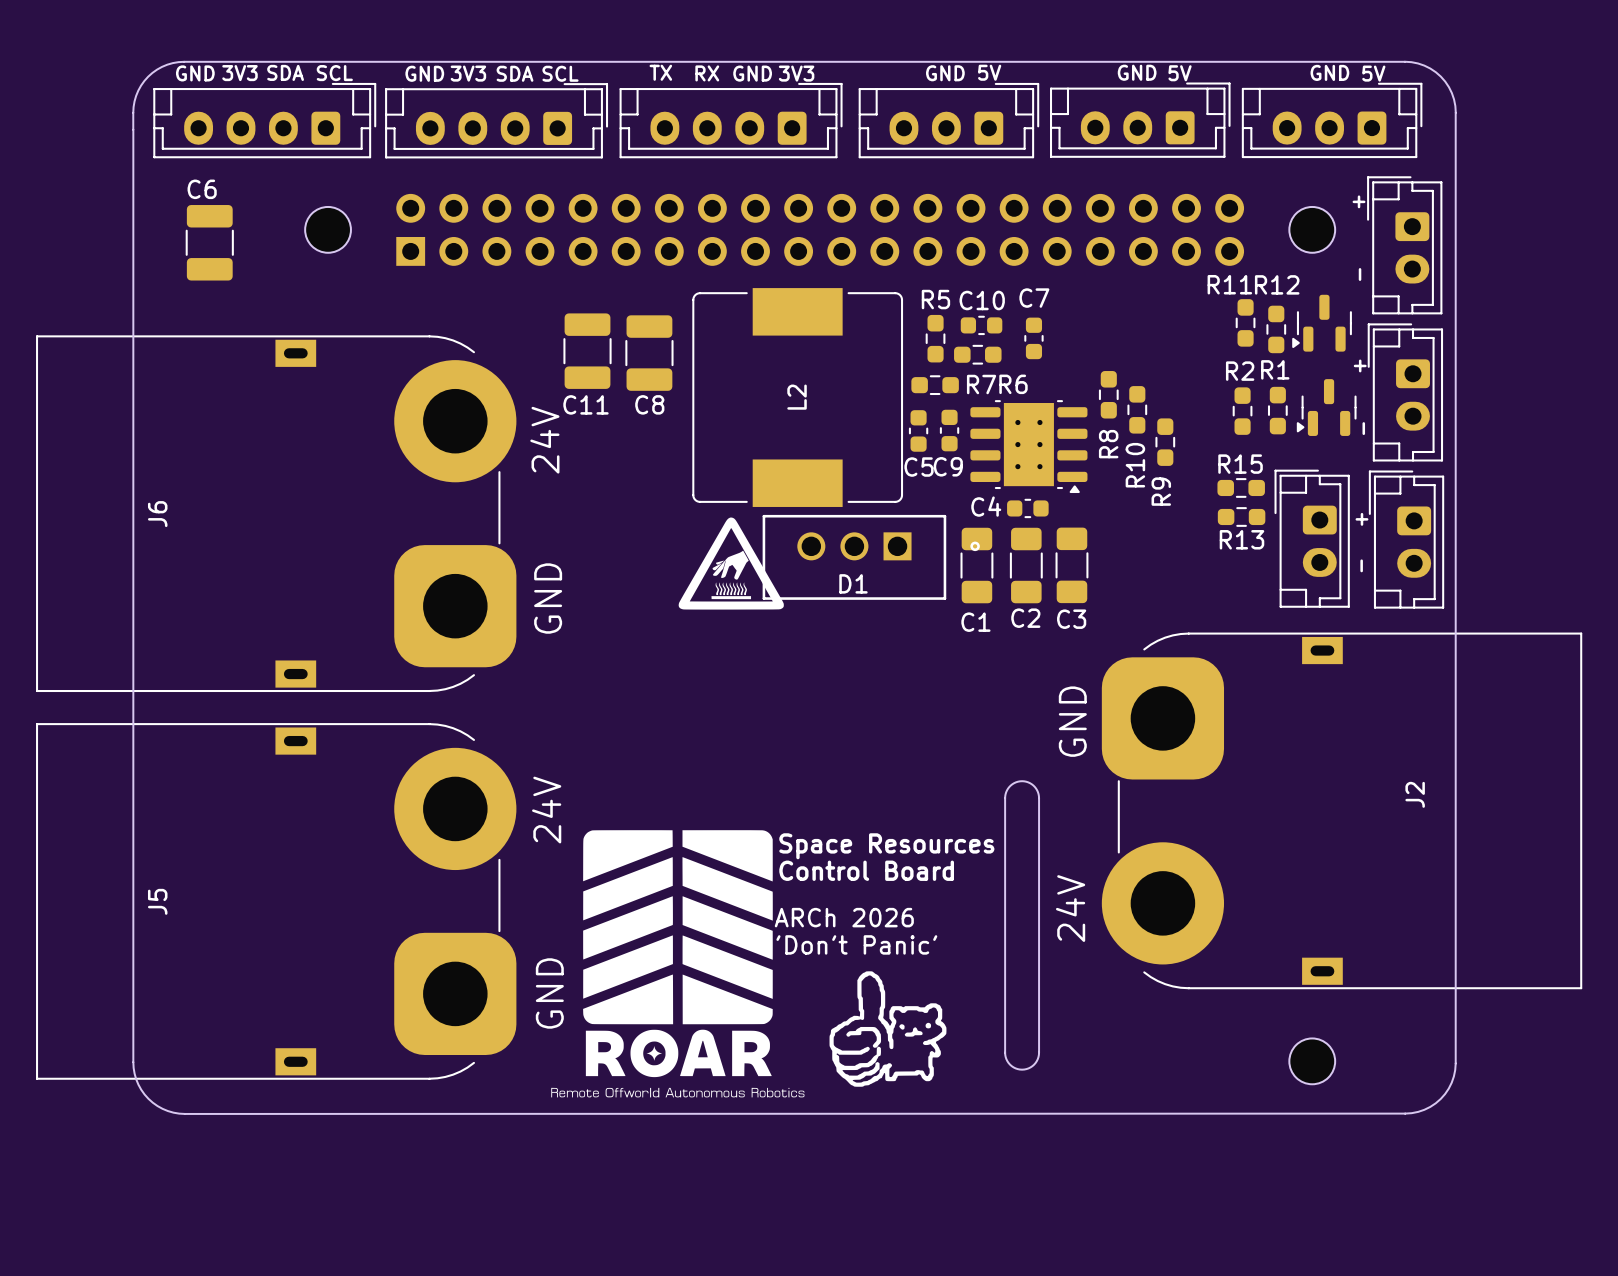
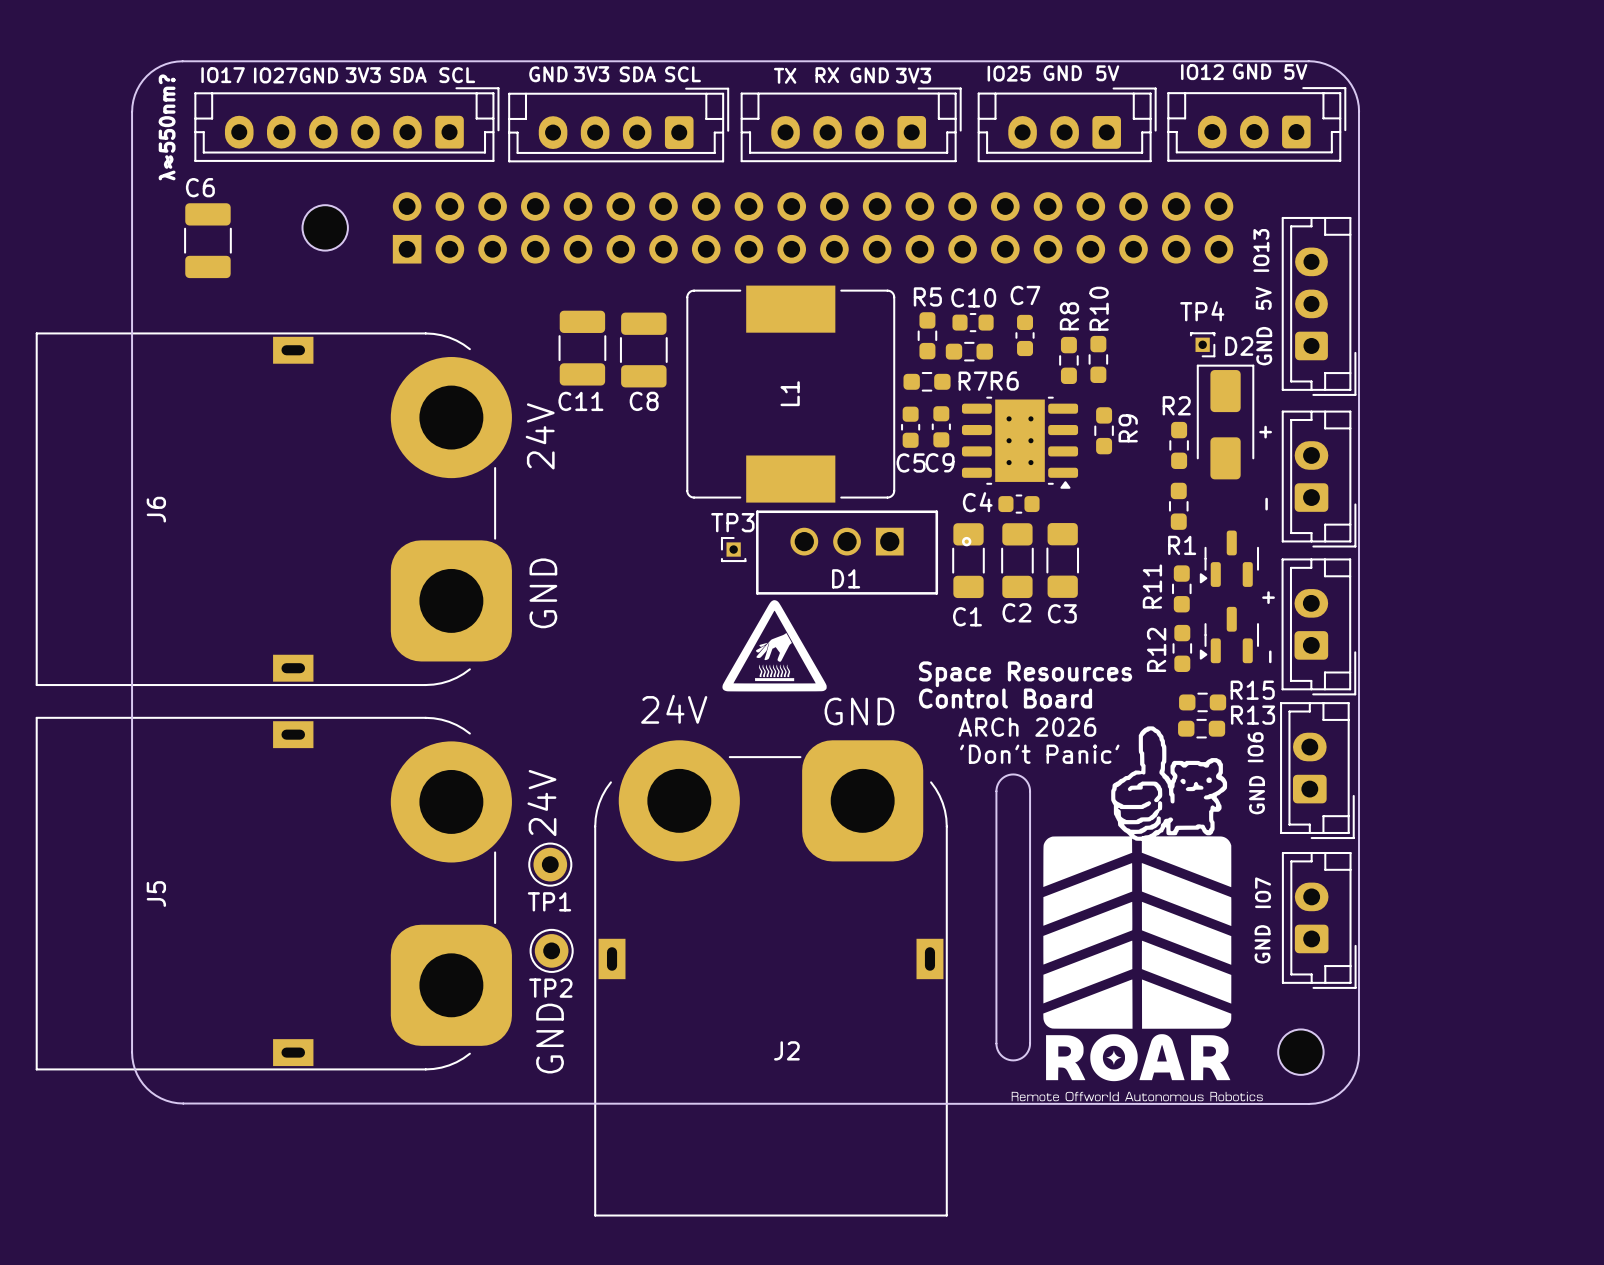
board edge: (1320, 61) (1404, 61) -> (1308, 61) (1325, 64) (1344, 75) (1356, 95) (1359, 111)
board edge: (1404, 61) (1424, 65) (1440, 76) (1451, 93) (1455, 112) -> none
text: SDA (285, 72) -> IO27 (275, 75)
text position: TX (660, 72) -> TX (785, 75)
text: 5V (989, 72) -> none
text: GND (1137, 72) -> none
text: none -> IO12 (1202, 72)
text: none -> GND (1252, 71)
text: none -> 5V (1295, 71)
text: GND (1329, 72) -> none
text: GND (195, 73) -> none
text: 3V3 (240, 73) -> none
text: SCL (334, 73) -> GND (318, 75)
text: GND (424, 73) -> SDA (408, 74)
text: 3V3 (468, 73) -> SCL (457, 75)
text: SDA (515, 73) -> none
text: SCL (560, 73) -> GND (548, 74)
text position: RX (707, 73) -> RX (827, 75)
text: GND (752, 73) -> none
text: 3V3 (796, 73) -> none
text: GND (945, 73) -> none
text: none -> GND (1062, 73)
text position: 5V (1180, 73) -> 5V (1107, 73)
text: 5V (1373, 73) -> none
text: none -> 3V3 (591, 74)
text: none -> SDA (637, 74)
text: none -> SCL (682, 74)
text: none -> IO25 (1009, 73)
text: none -> IO17 (223, 75)
text: none -> 3V3 (363, 75)
text: none -> GND (869, 75)
text: none -> 3V3 (913, 75)
board edge: (1455, 112) (1455, 1063) (1451, 1082) (1440, 1098) (1424, 1109) (1405, 1113) (185, 1113) (167, 1111) (152, 1102) (138, 1084) (133, 1062) (133, 129) -> (1359, 111) (1359, 1054) (1355, 1073) (1344, 1089) (1327, 1100) (1308, 1103) (183, 1103) (166, 1100) (151, 1092) (137, 1074) (132, 1052) (132, 128)
part: (264, 120) -> none
part: (496, 120) -> none
part: (731, 120) -> none
part: (948, 120) -> none
part: (1140, 120) -> none
part: (1332, 120) -> none
part: none -> (346, 124)
part: none -> (851, 124)
part: none -> (1067, 124)
part: none -> (1256, 124)
part: none -> (618, 125)
text: none -> λ≈550nm? (167, 127)
text: + (1359, 201) -> none
part: (1312, 229) -> none
part: (1404, 245) -> none
text: none -> IO13 (1261, 250)
text: - (1360, 274) -> none
R11 name rotation: 0° (1229, 284) -> 90° counterclockwise (1152, 586)
R12 name rotation: 0° (1277, 284) -> 90° counterclockwise (1156, 649)
part footprint: [1292, 294, 1352, 352] -> [1281, 216, 1357, 396]
text: none -> 5V (1263, 298)
R11 position: (1245, 322) -> (1181, 588)
R12 position: (1276, 329) -> (1182, 648)
TP4: none -> (1202, 344)
text: none -> GND (1264, 346)
text: + (1360, 365) -> none
R1 name position: R1 (1275, 369) -> R1 (1182, 545)
part: (1405, 392) -> none
R8 position: (1108, 394) -> (1068, 360)
L2 name: L2 (797, 397) -> L1 (790, 393)
part: (1326, 407) -> none
R10 position: (1137, 409) -> (1098, 359)
R1 position: (1277, 410) -> (1178, 506)
R2 position: (1242, 411) -> (1179, 445)
D2: none -> (1225, 422)
text: - (1363, 428) -> none
text: none -> + (1265, 432)
R9 position: (1165, 442) -> (1104, 430)
R8 name position: R8 (1108, 444) -> R8 (1069, 316)
R15 name position: R15 (1240, 464) -> R15 (1252, 690)
R10 name position: R10 (1135, 465) -> R10 (1099, 308)
part: none -> (1319, 479)
R15 position: (1241, 487) -> (1202, 702)
R9 name position: R9 (1161, 491) -> R9 (1128, 428)
text: none -> - (1266, 504)
R13 position: (1241, 516) -> (1201, 728)
text: + (1361, 519) -> none
part: (1312, 538) -> none
R13 name position: R13 (1241, 539) -> R13 (1253, 715)
part: (1406, 539) -> none
TP3: none -> (733, 549)
drawing position: (719, 562) -> (763, 644)
drawing position: (731, 563) -> (774, 645)
part: none -> (1229, 558)
drawing position: (730, 565) -> (774, 647)
text: - (1361, 565) -> none
drawing position: (717, 566) -> (760, 649)
drawing: [719, 582, 747, 596] -> none
drawing position: (717, 588) -> (760, 670)
drawing position: (724, 588) -> (767, 670)
drawing position: (731, 588) -> (774, 670)
drawing position: (738, 588) -> (781, 670)
drawing position: (731, 597) -> (774, 679)
text: none -> + (1268, 597)
part: none -> (1318, 626)
part: none -> (1229, 635)
text: none -> - (1270, 656)
drawing: none -> [762, 664, 791, 678]
text: none -> IO6 (1255, 747)
part: none -> (1317, 770)
text: none -> GND (1257, 795)
J2 rotation: 0° (1342, 810) -> 90° clockwise (771, 978)
J2 position: (1342, 810) -> (771, 978)
drawing: [551, 830, 805, 1098] -> none
drawing: none -> [1011, 836, 1263, 1102]
text position: Space Resources (886, 846) -> Space Resources (1025, 674)
text position: Control Board (866, 870) -> Control Board (1005, 698)
TP1: none -> (550, 864)
text: none -> IO7 (1263, 892)
text position: ARCh 2026 (844, 917) -> ARCh 2026 (1027, 727)
part: none -> (1319, 920)
text position: 'Don't Panic' (856, 944) -> 'Don't Panic' (1039, 754)
text: none -> GND (1262, 944)
TP2: none -> (551, 950)
text position: GND (549, 993) -> GND (550, 1038)
drawing position: (928, 1025) -> (1209, 780)
drawing position: (901, 1026) -> (1182, 781)
drawing position: (887, 1029) -> (1169, 783)
drawing position: (913, 1031) -> (1194, 786)
drawing position: (863, 1037) -> (1145, 791)

